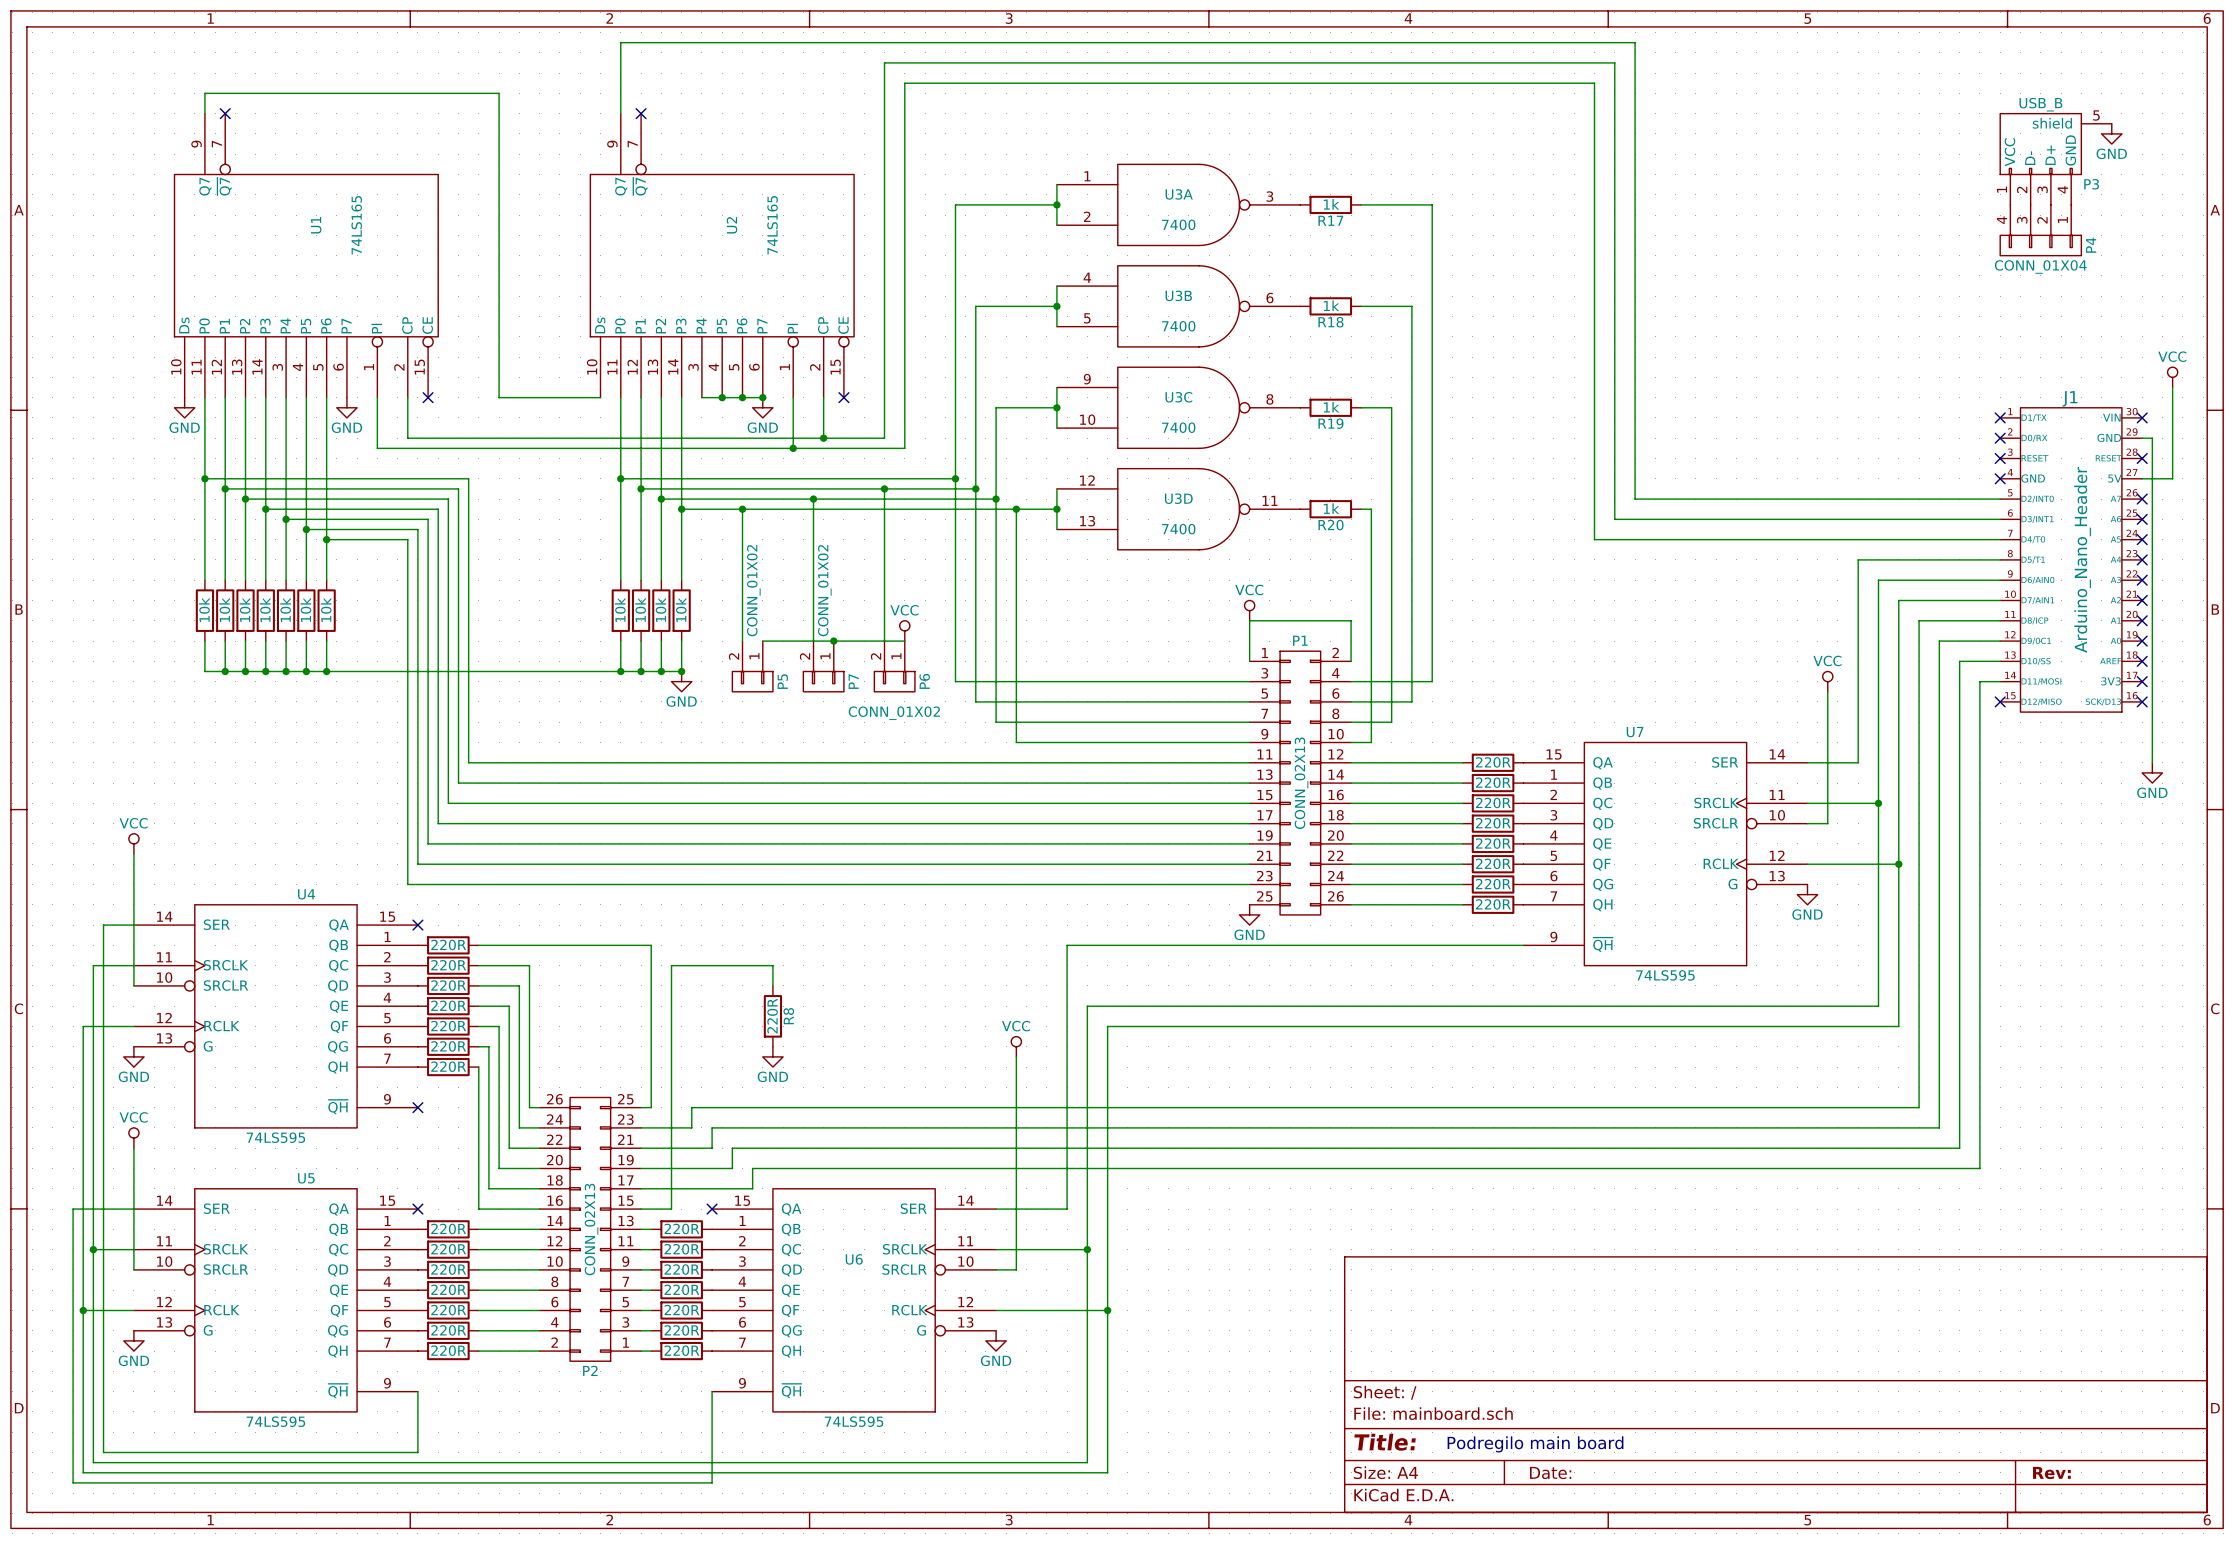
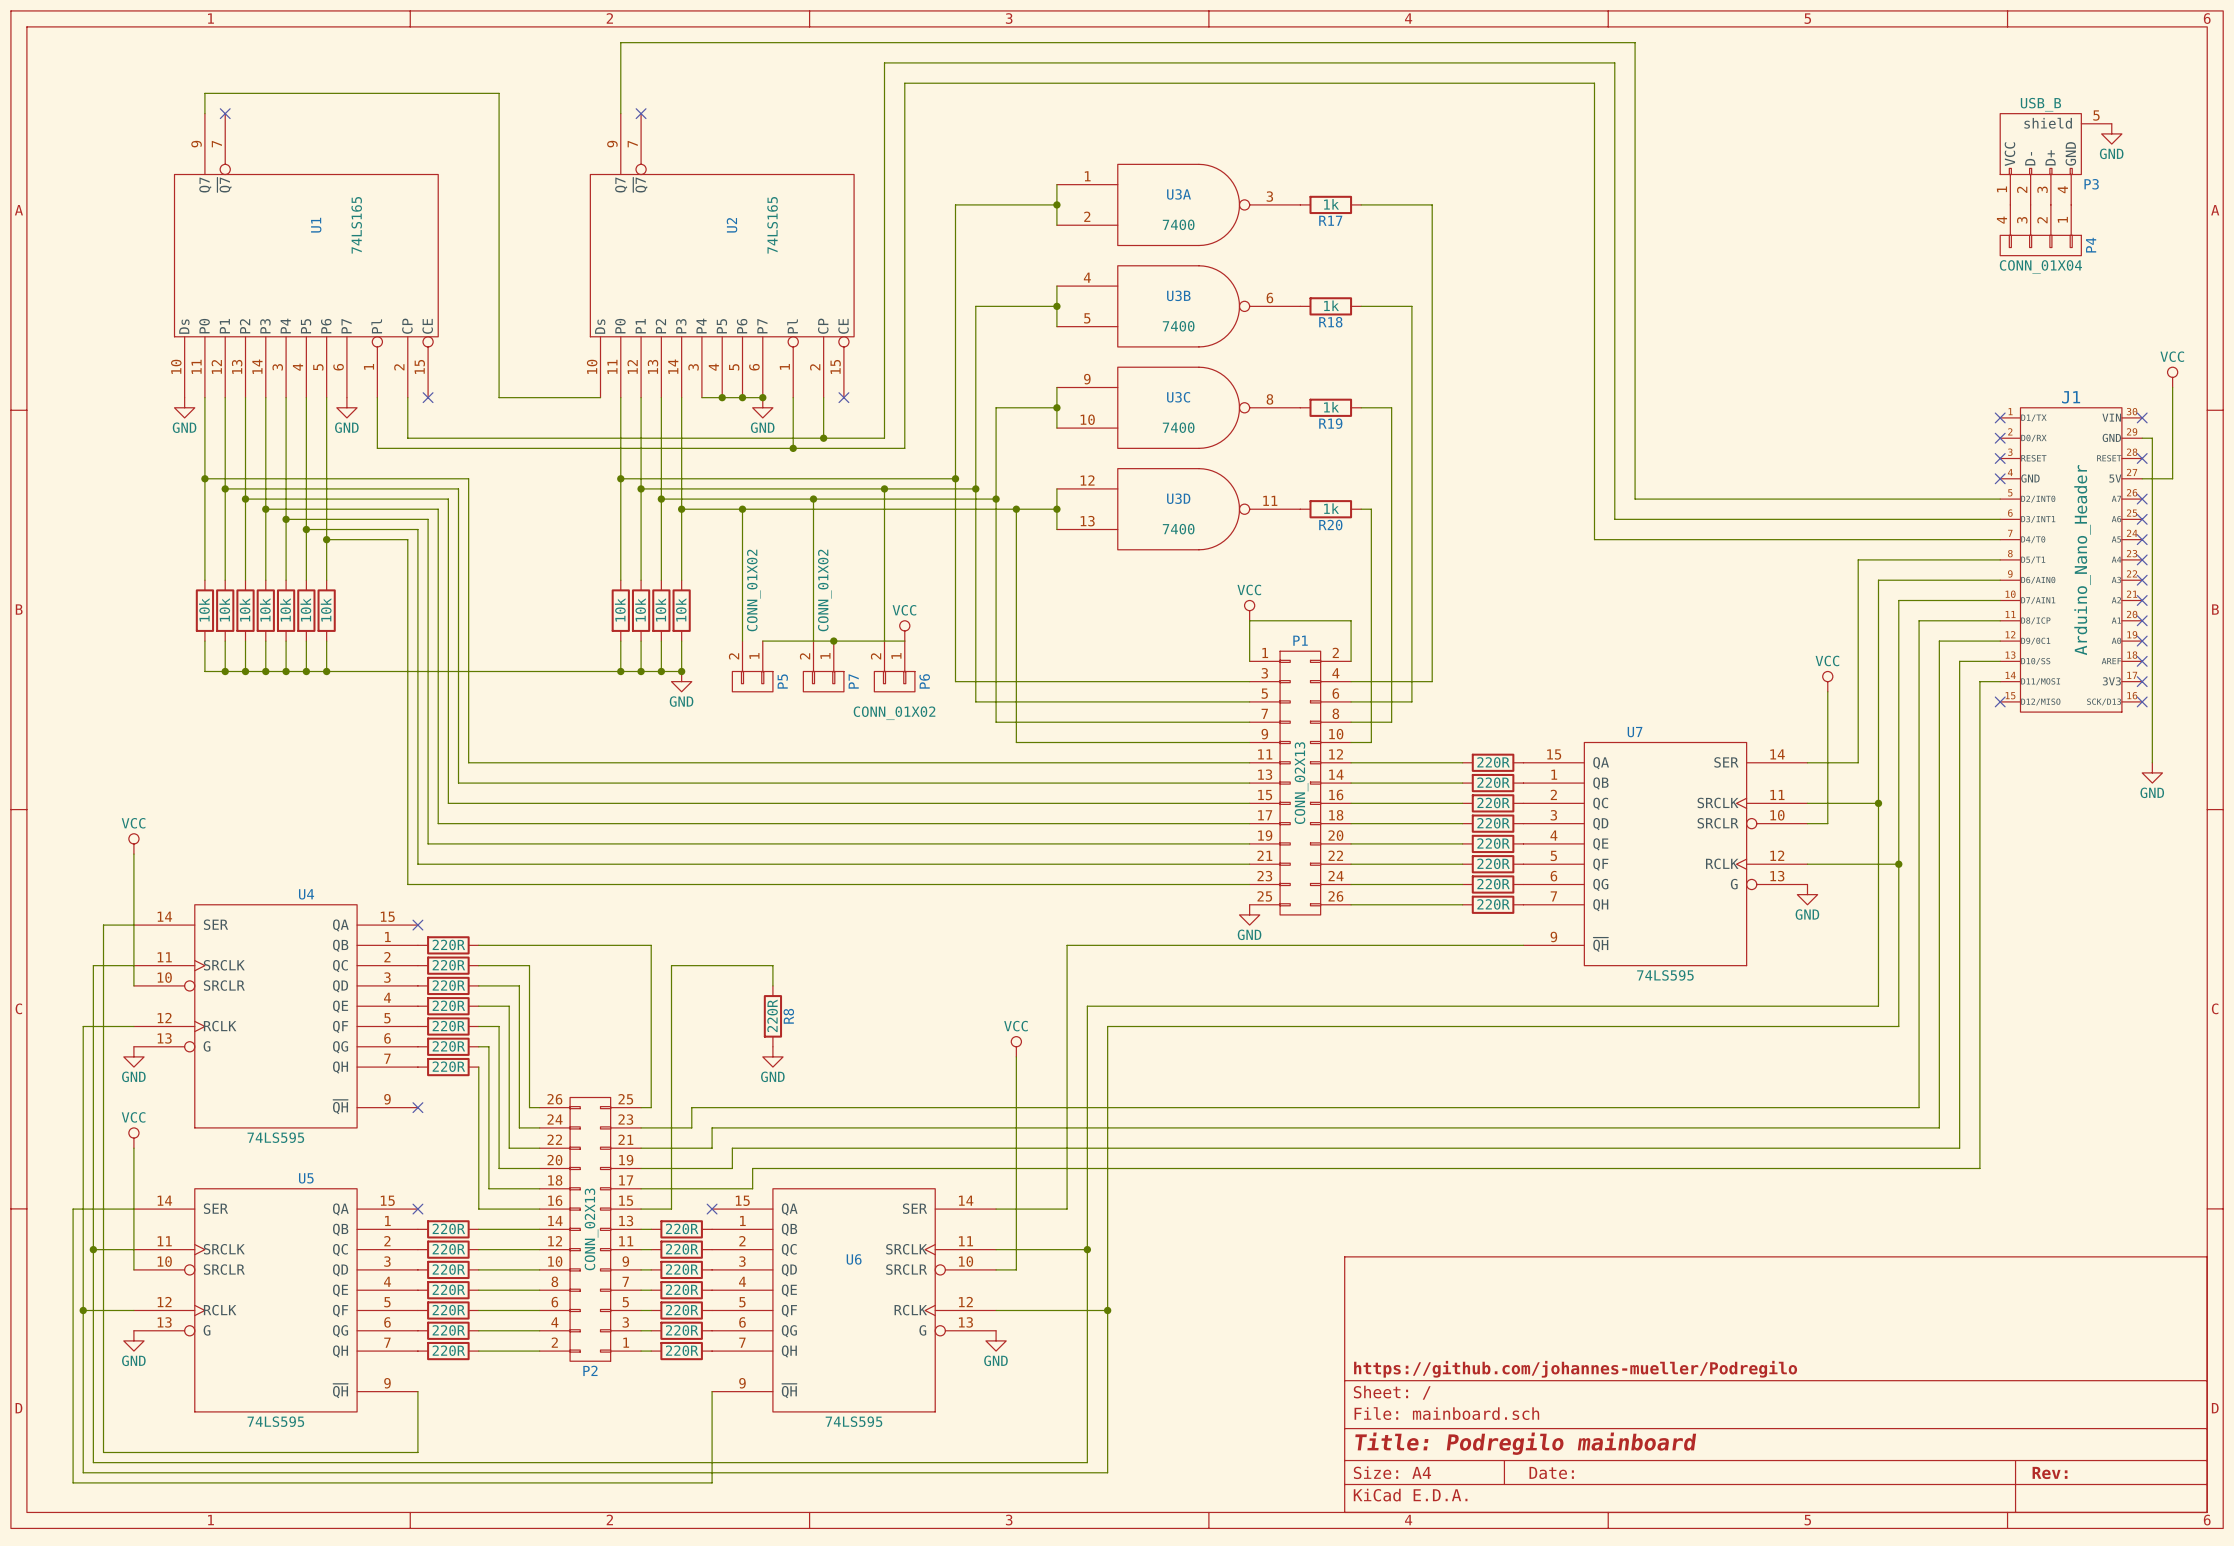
title block: none -> https://github.com/johannes-mueller/Podregilo (1575, 1369)
title block: Title: (1385, 1442) -> Title: Podregilo mainboard (1525, 1443)
text: Podregilo main board (1535, 1444) -> none

